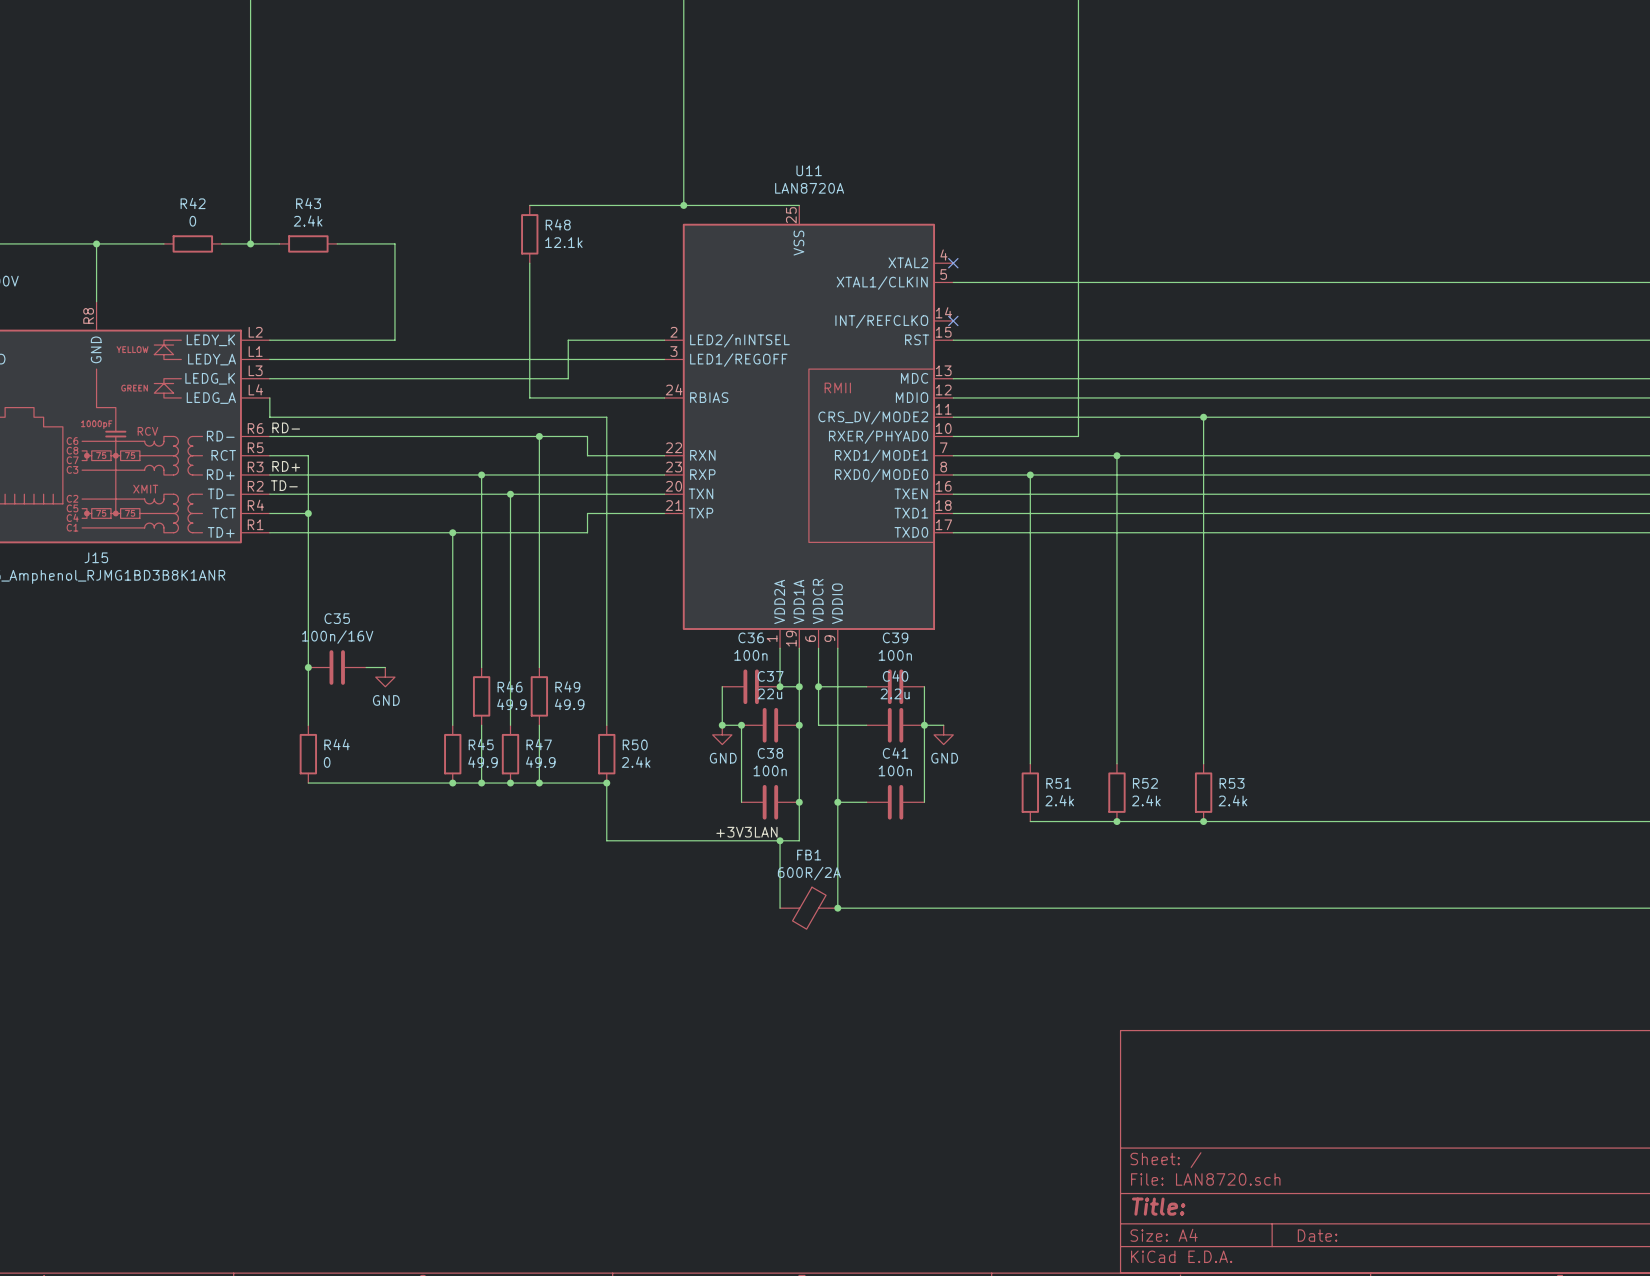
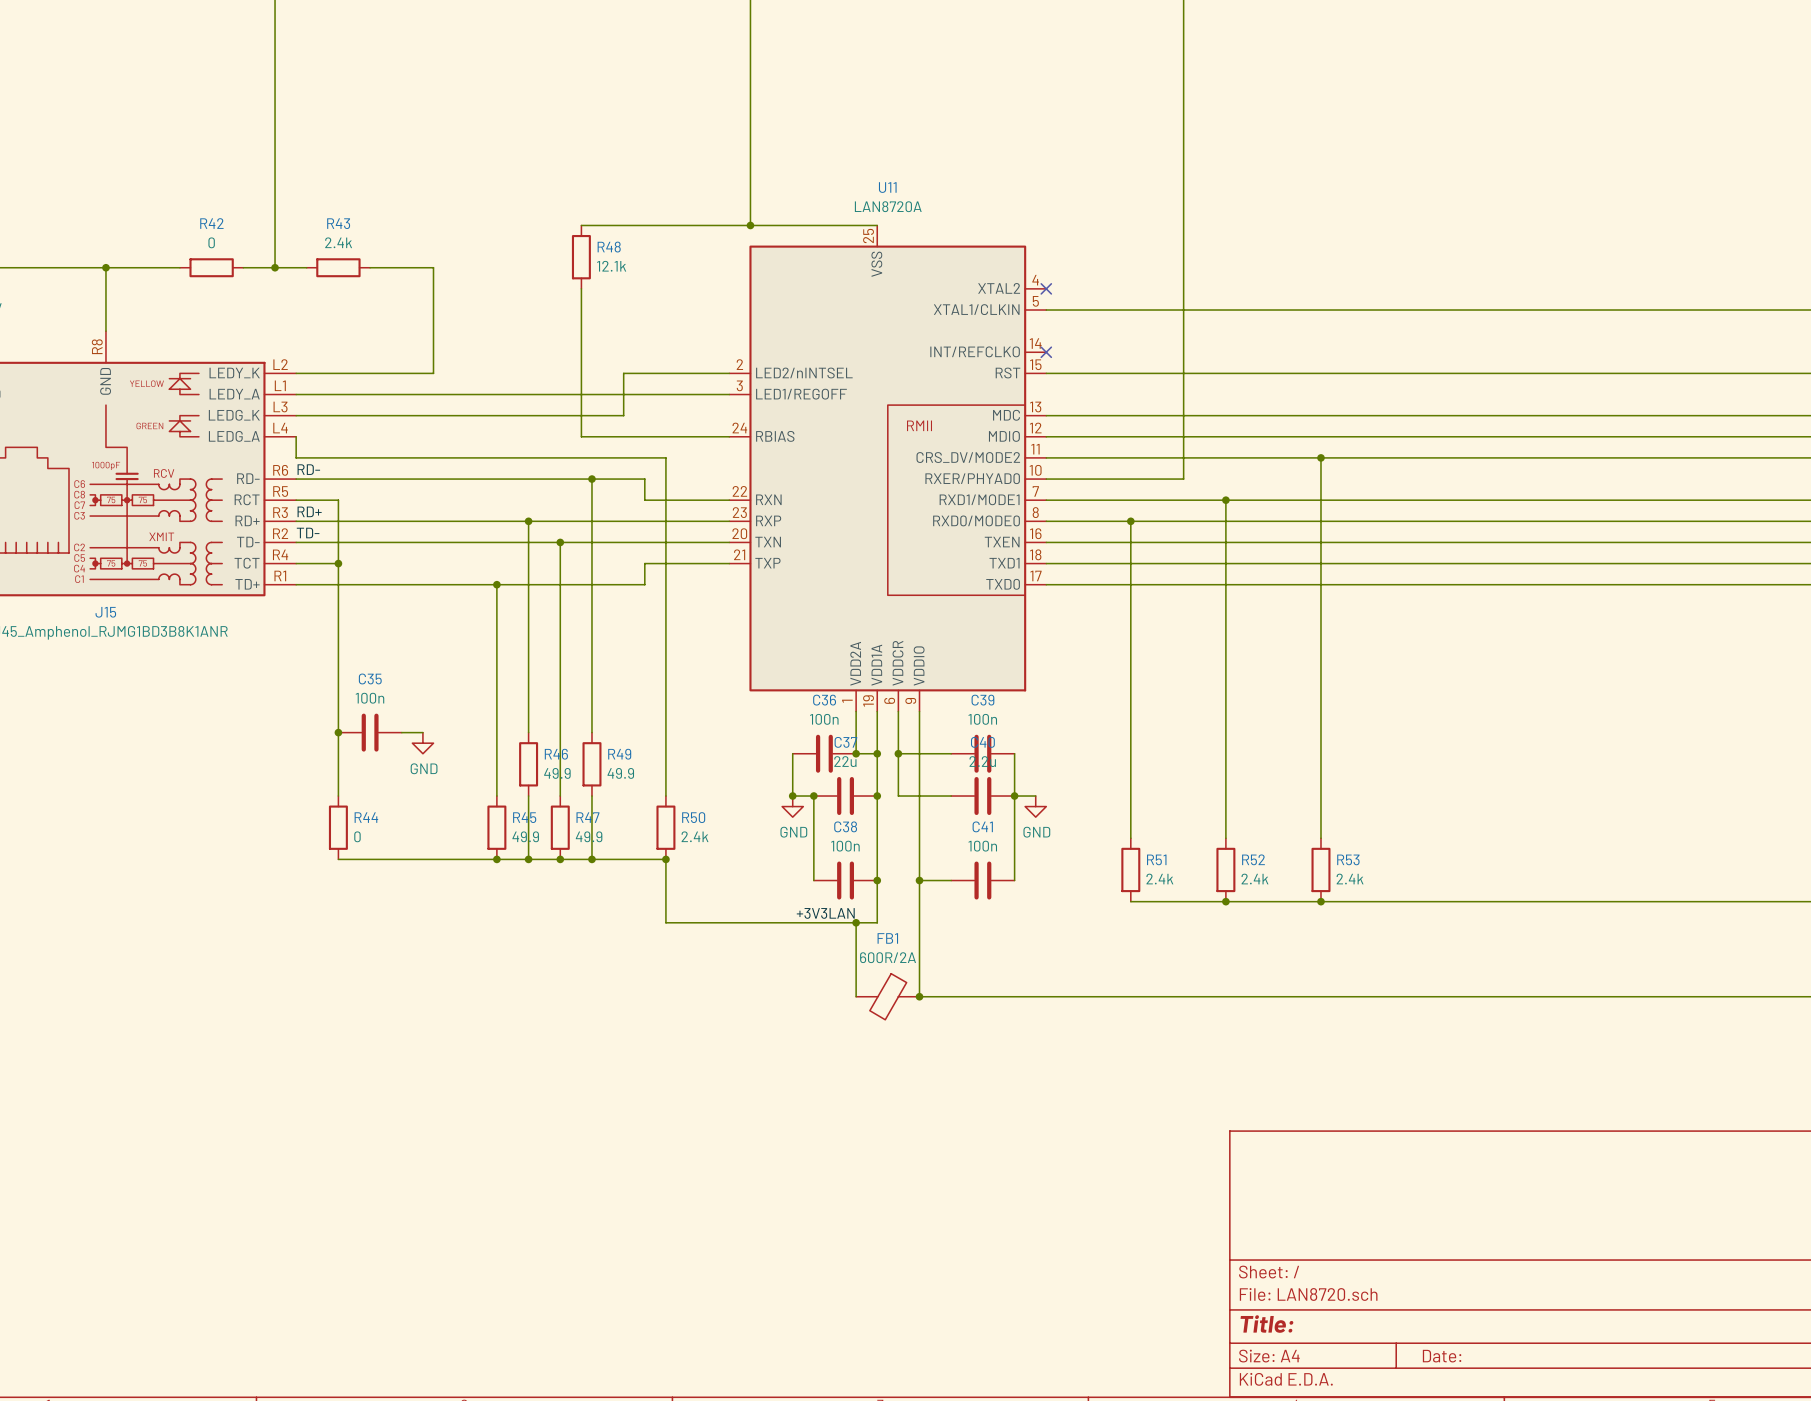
C35 value: 100n/16V (337, 637) -> 100n (369, 698)

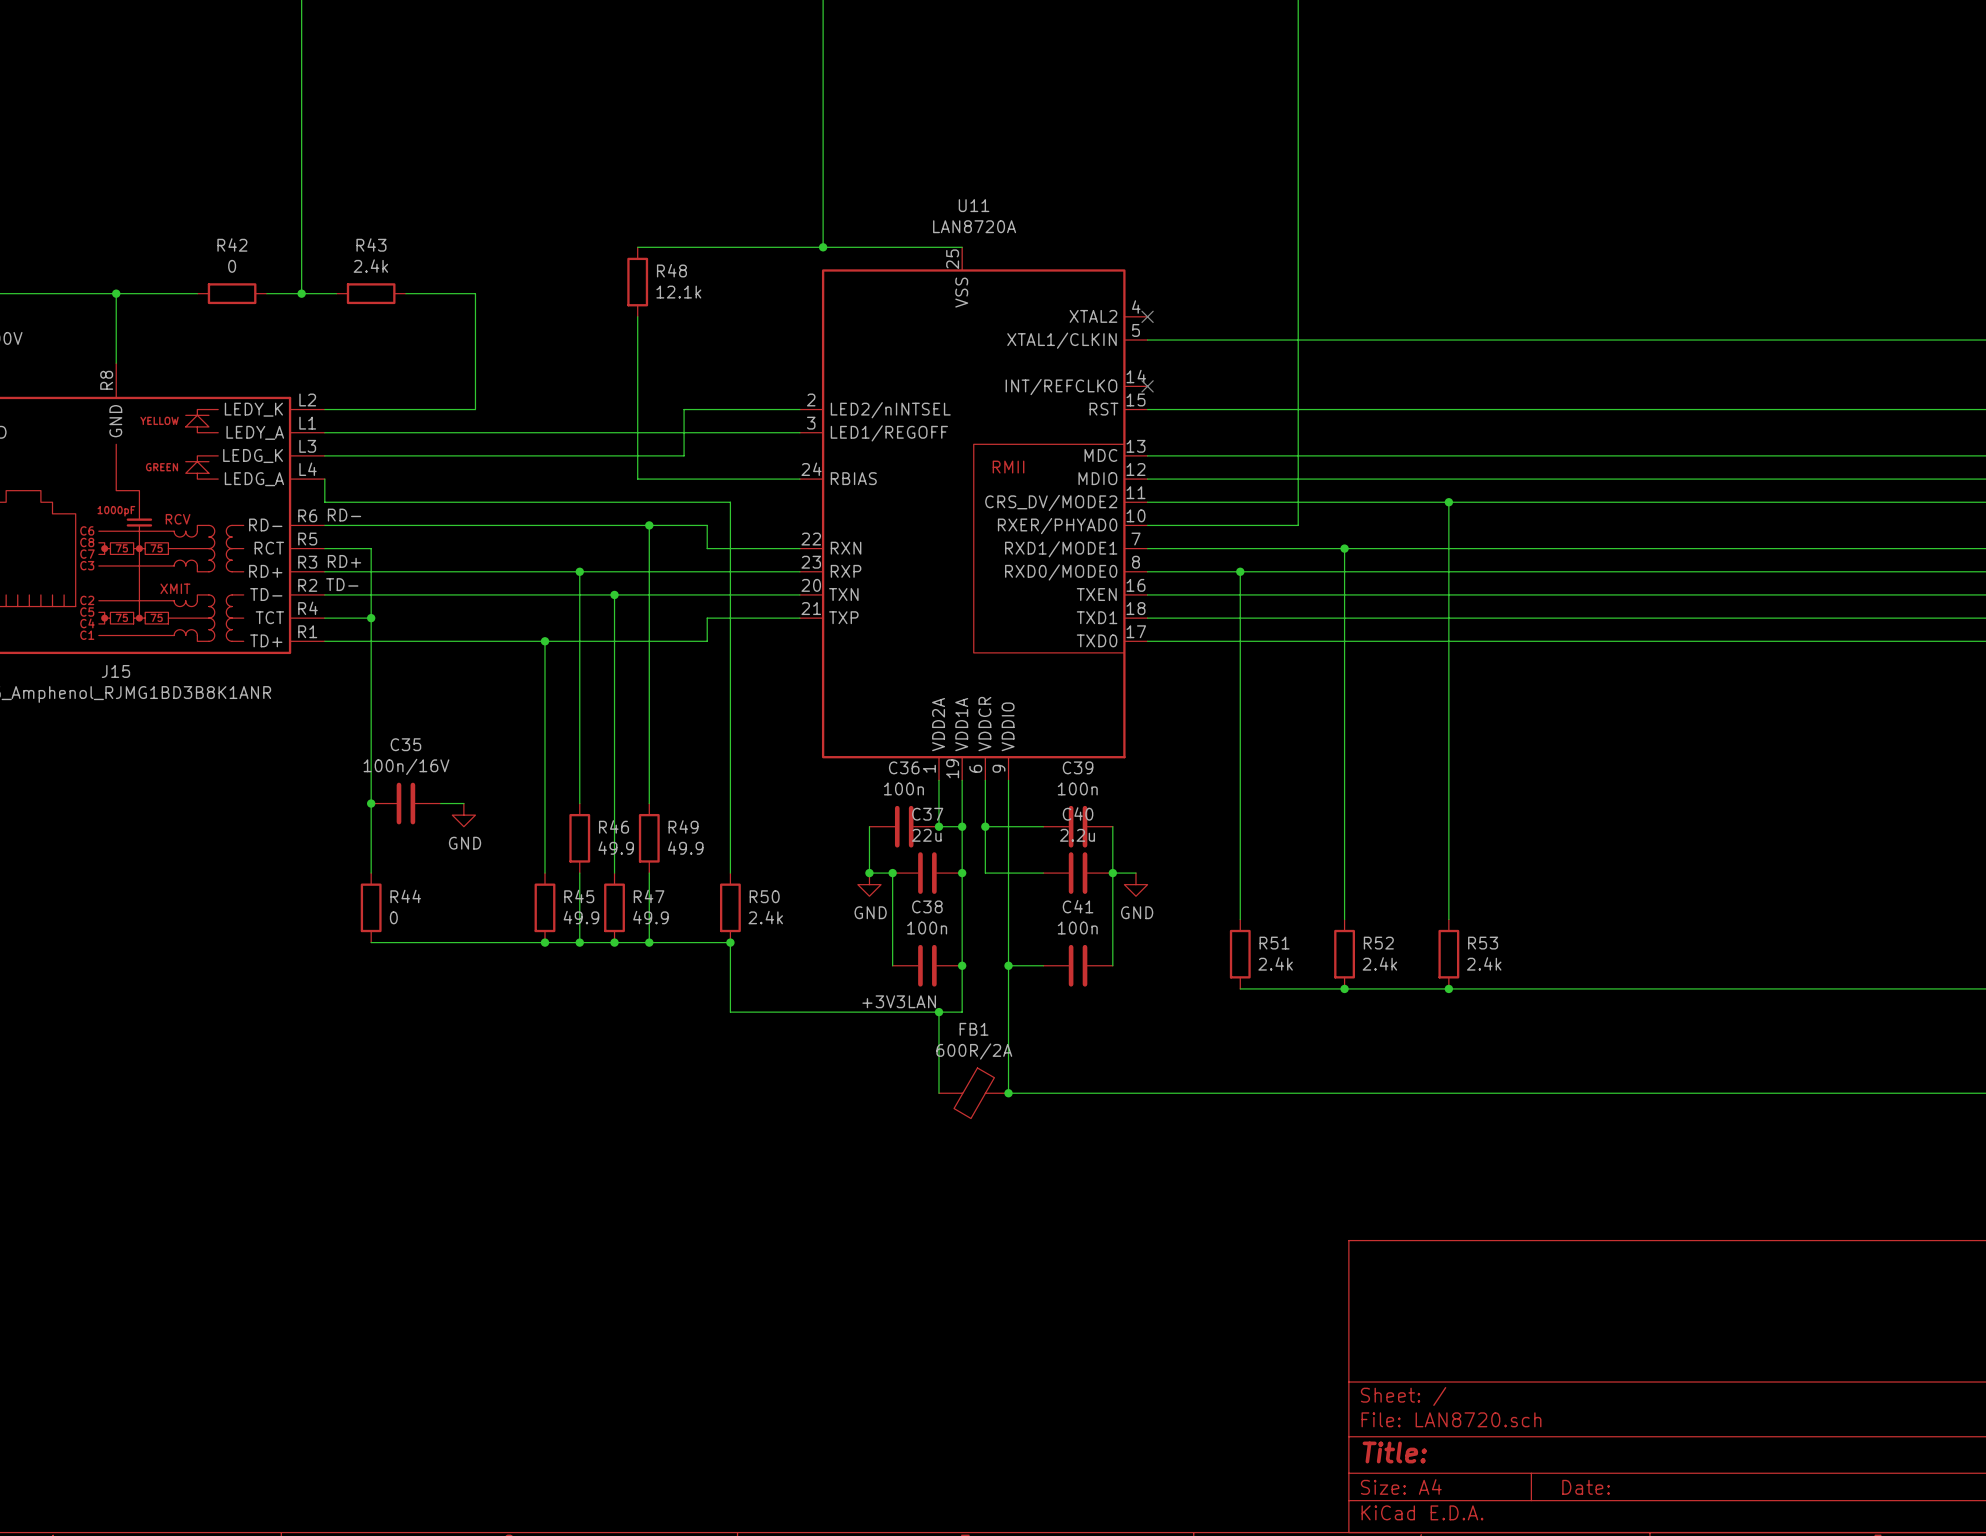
C35 value: 100n (369, 698) -> 100n/16V (406, 766)

